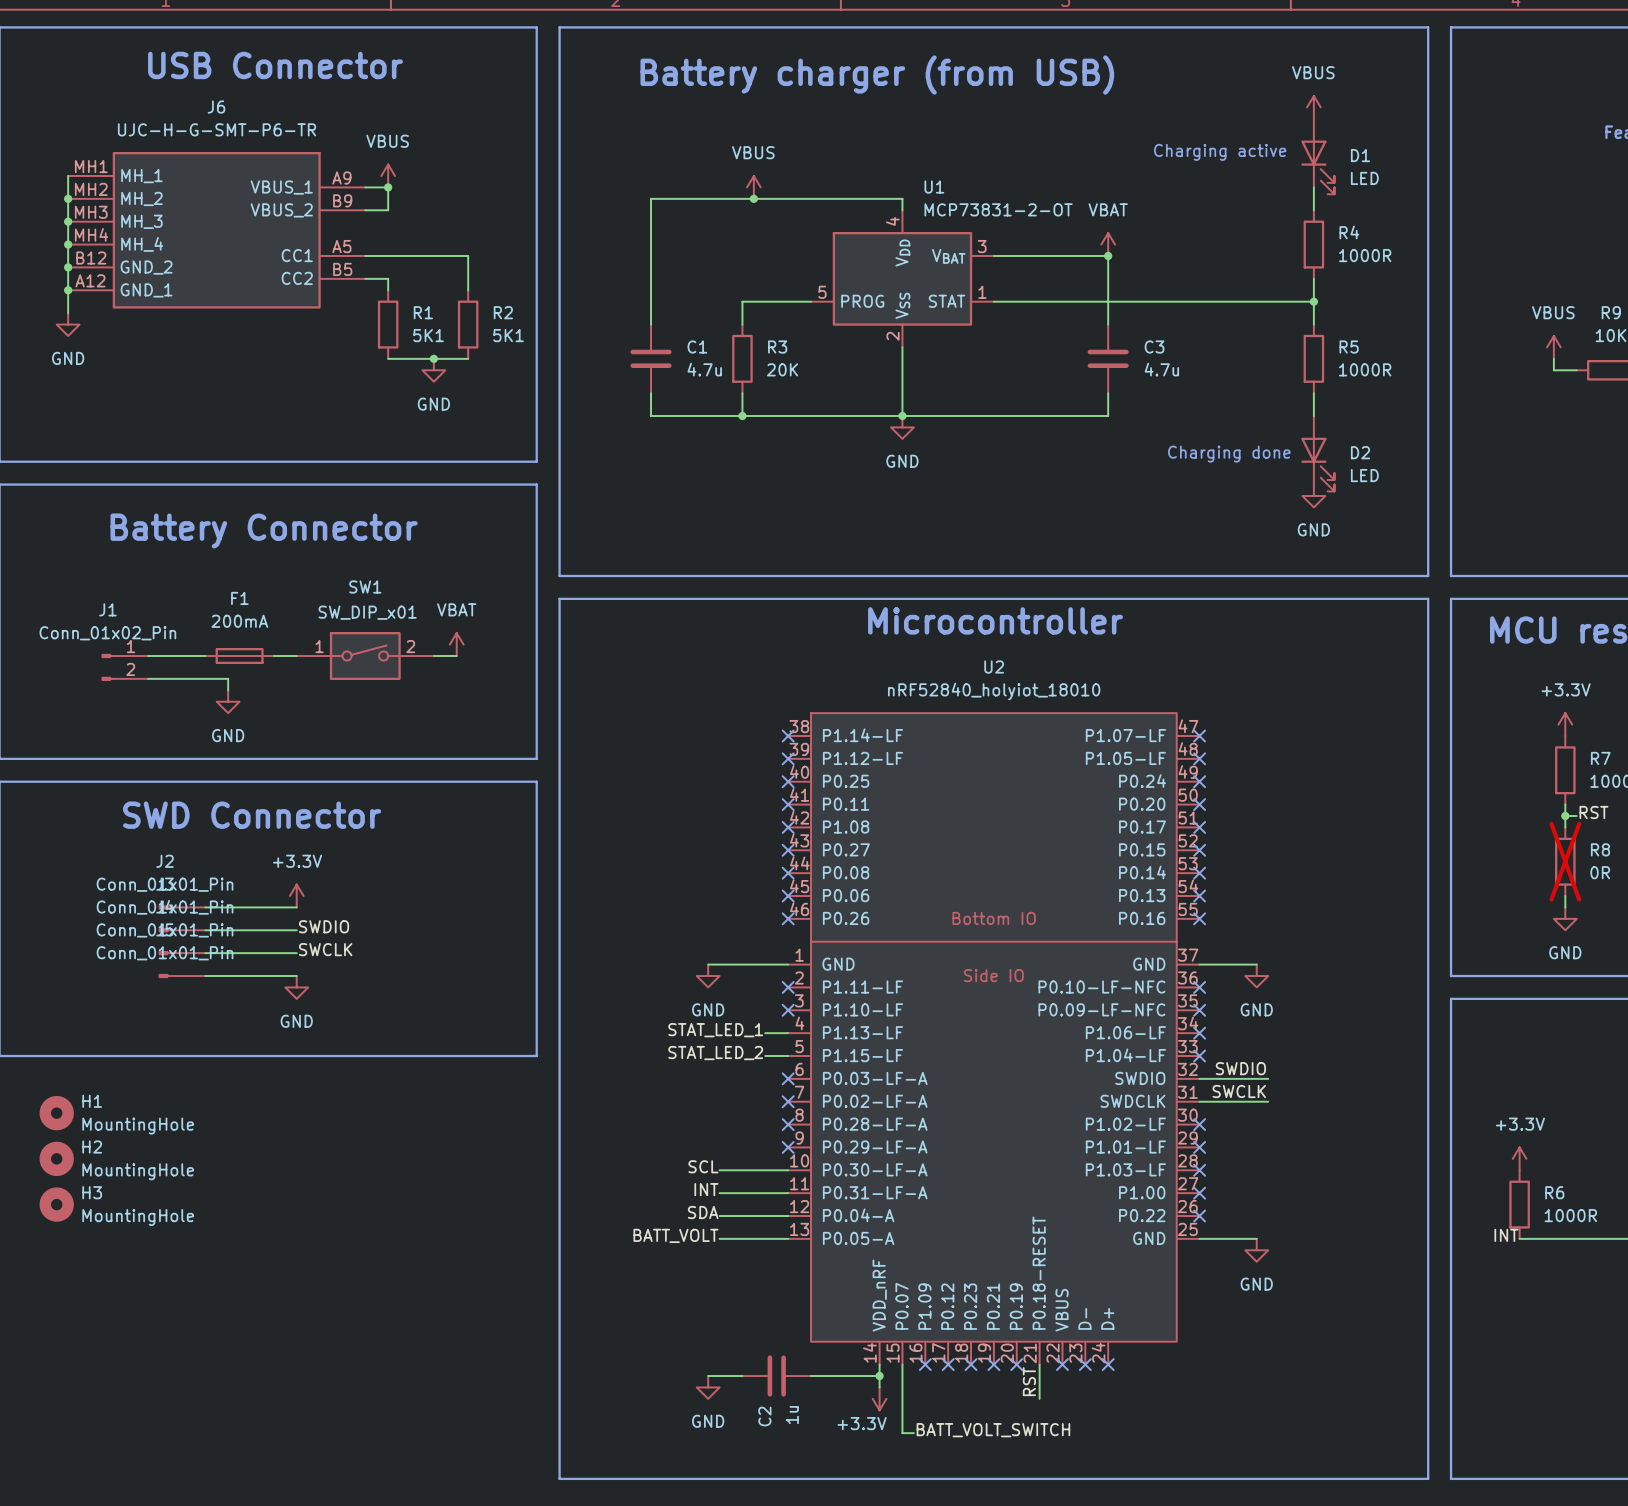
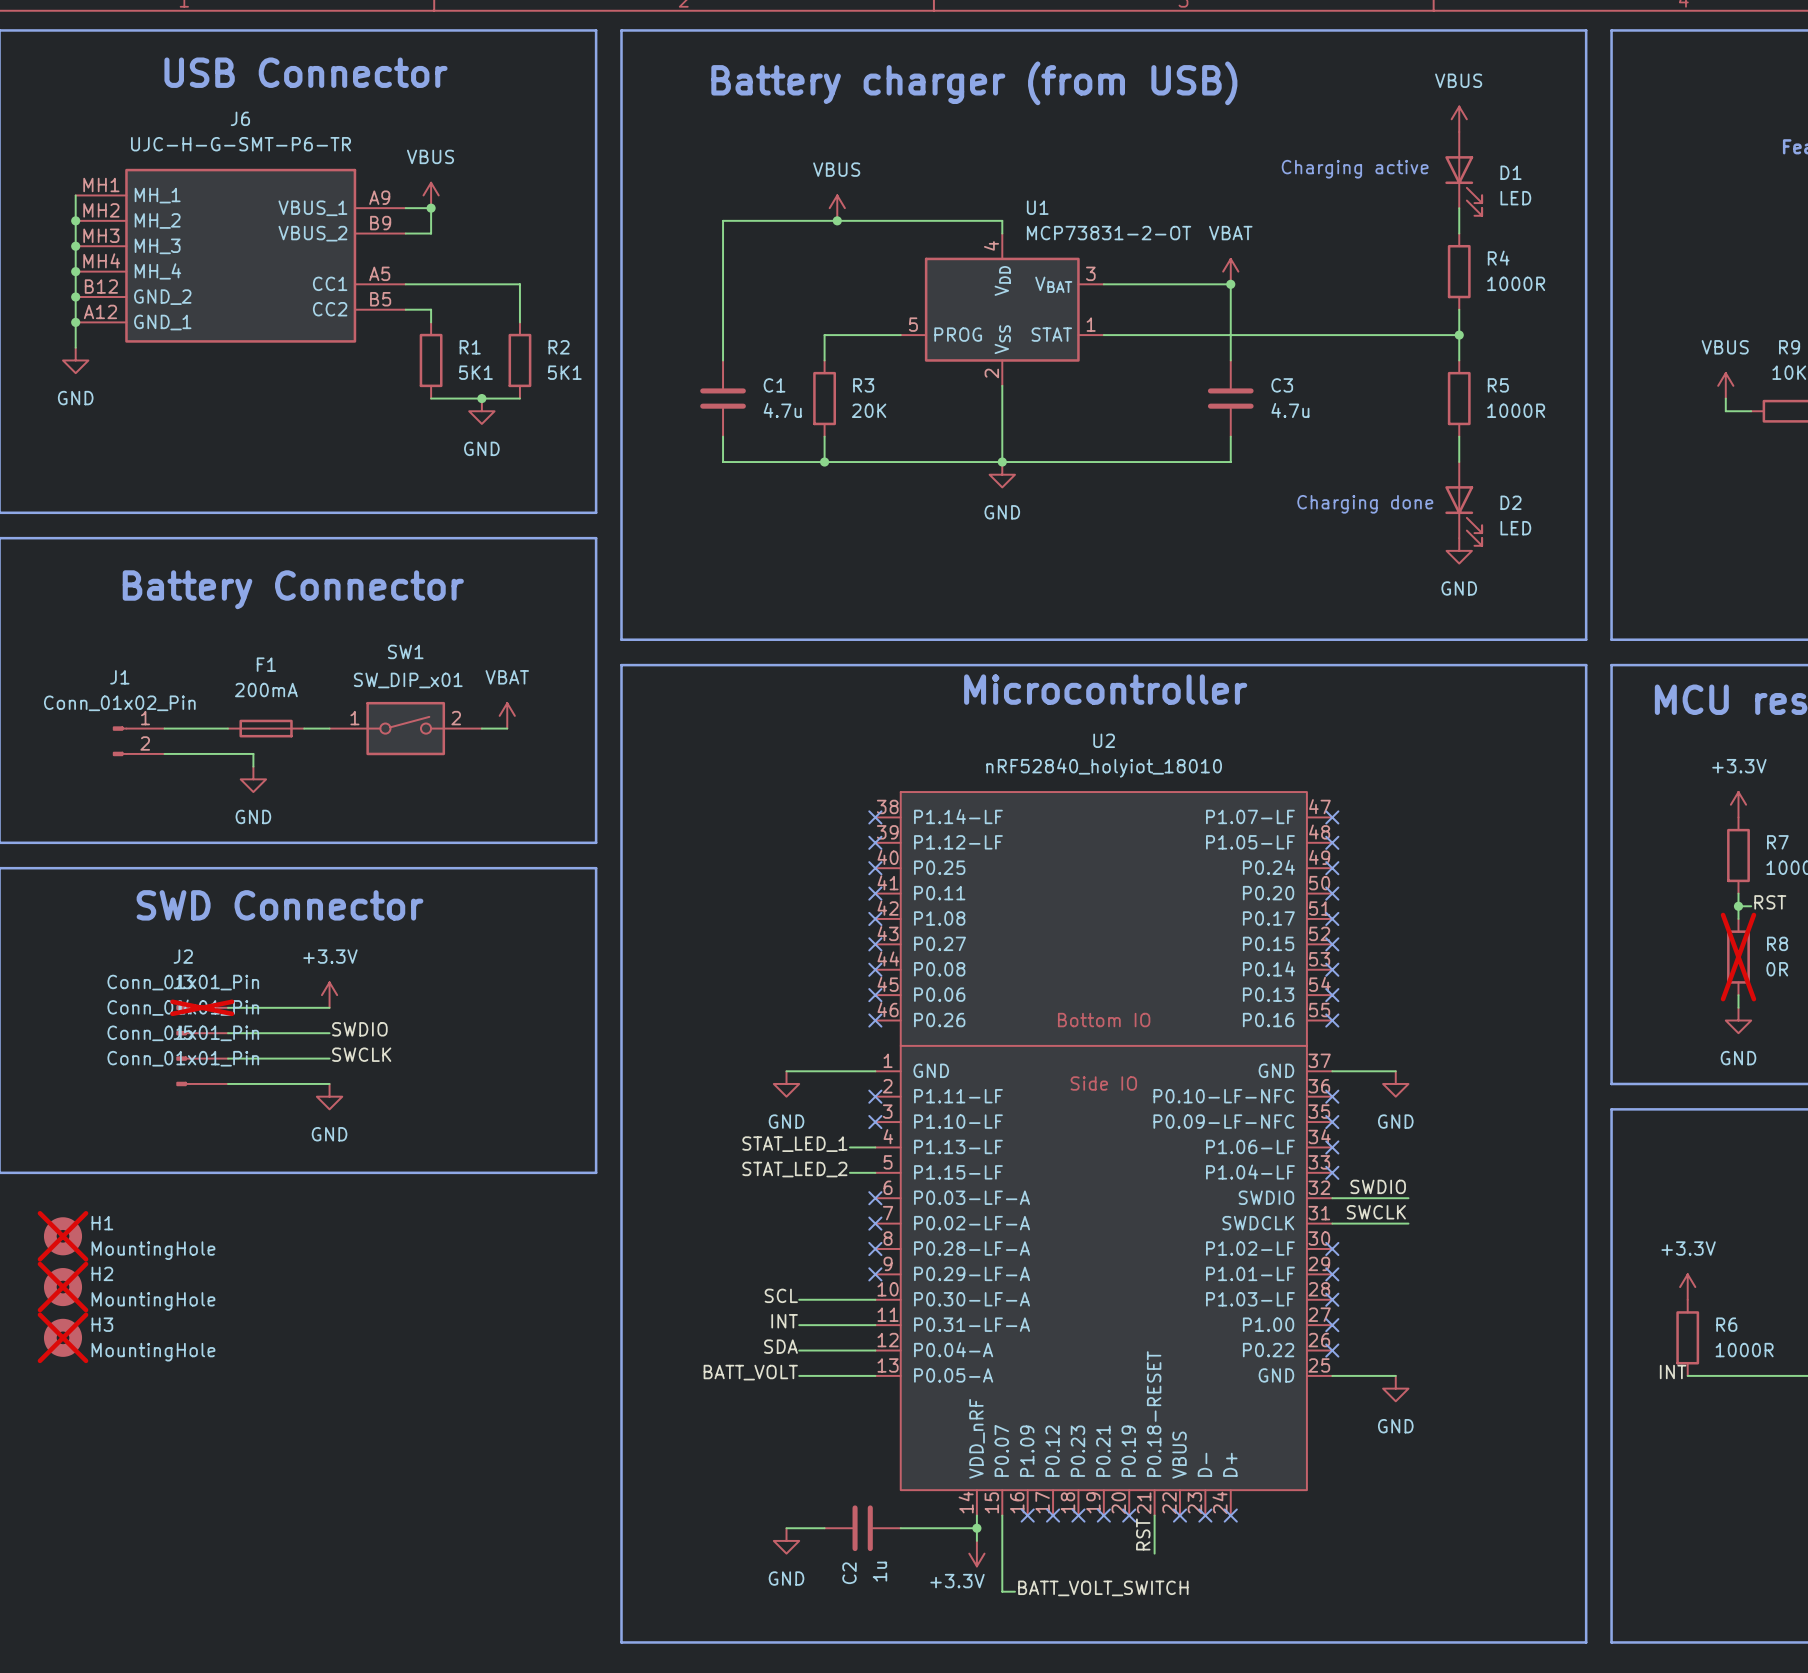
J2 do-not-place cross: none -> (202, 1007)
H1 do-not-place cross: none -> (63, 1236)
H2 do-not-place cross: none -> (63, 1287)
H3 do-not-place cross: none -> (63, 1337)

